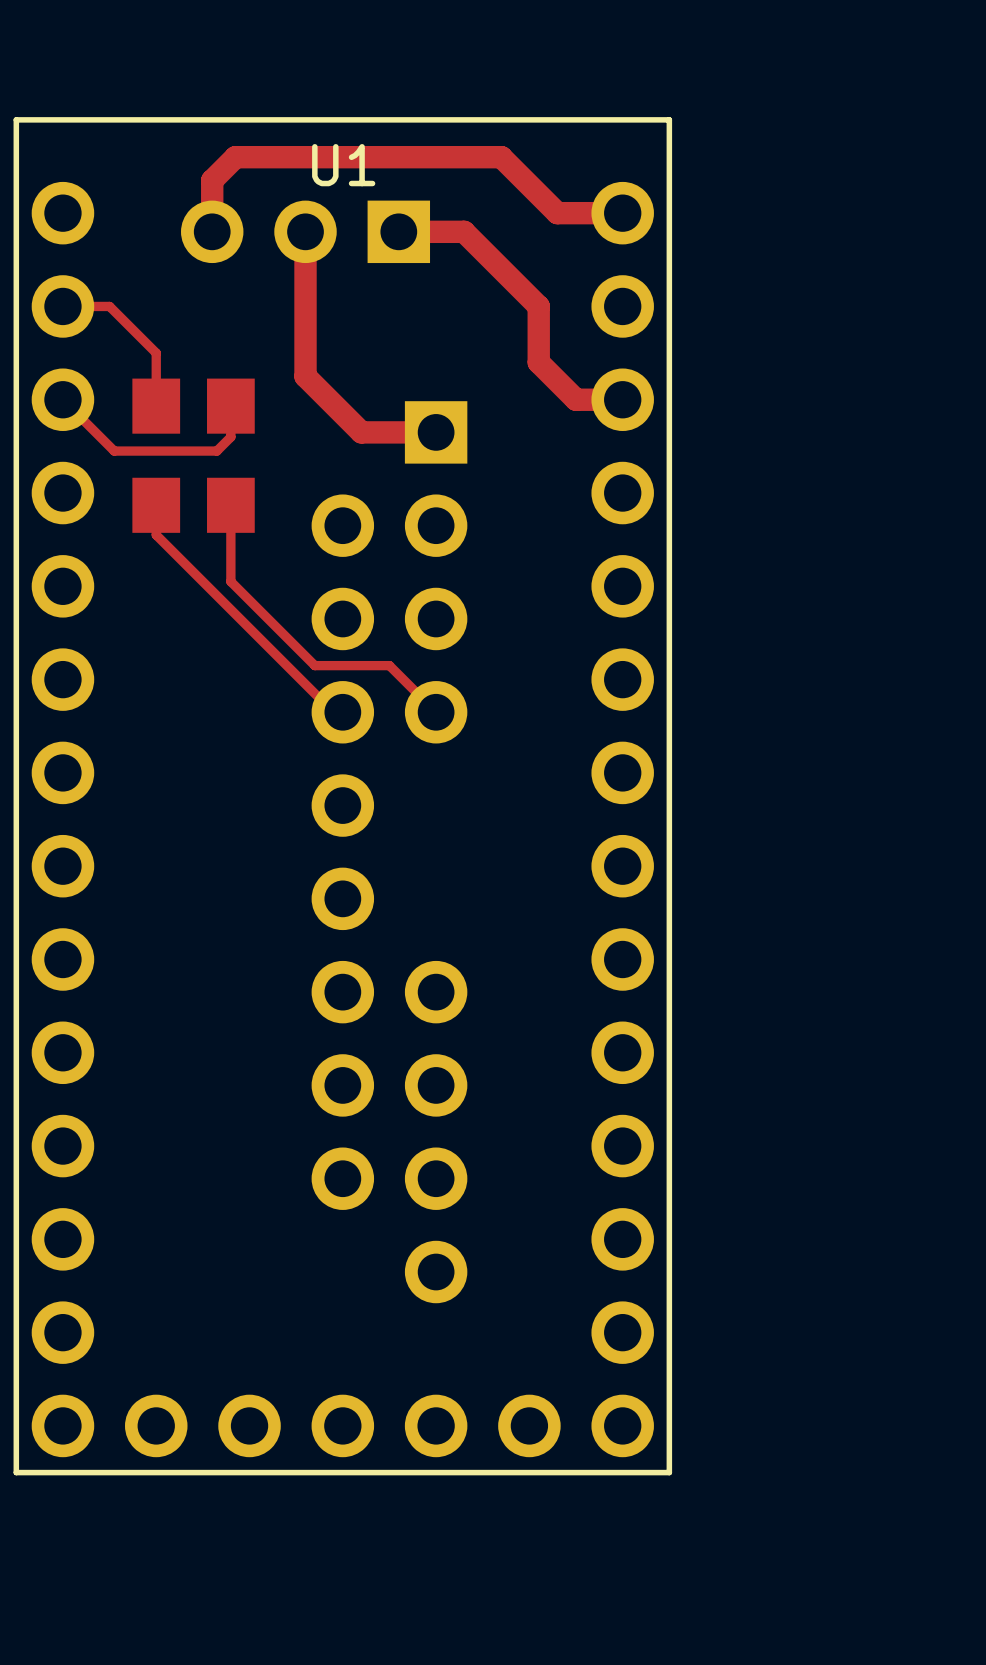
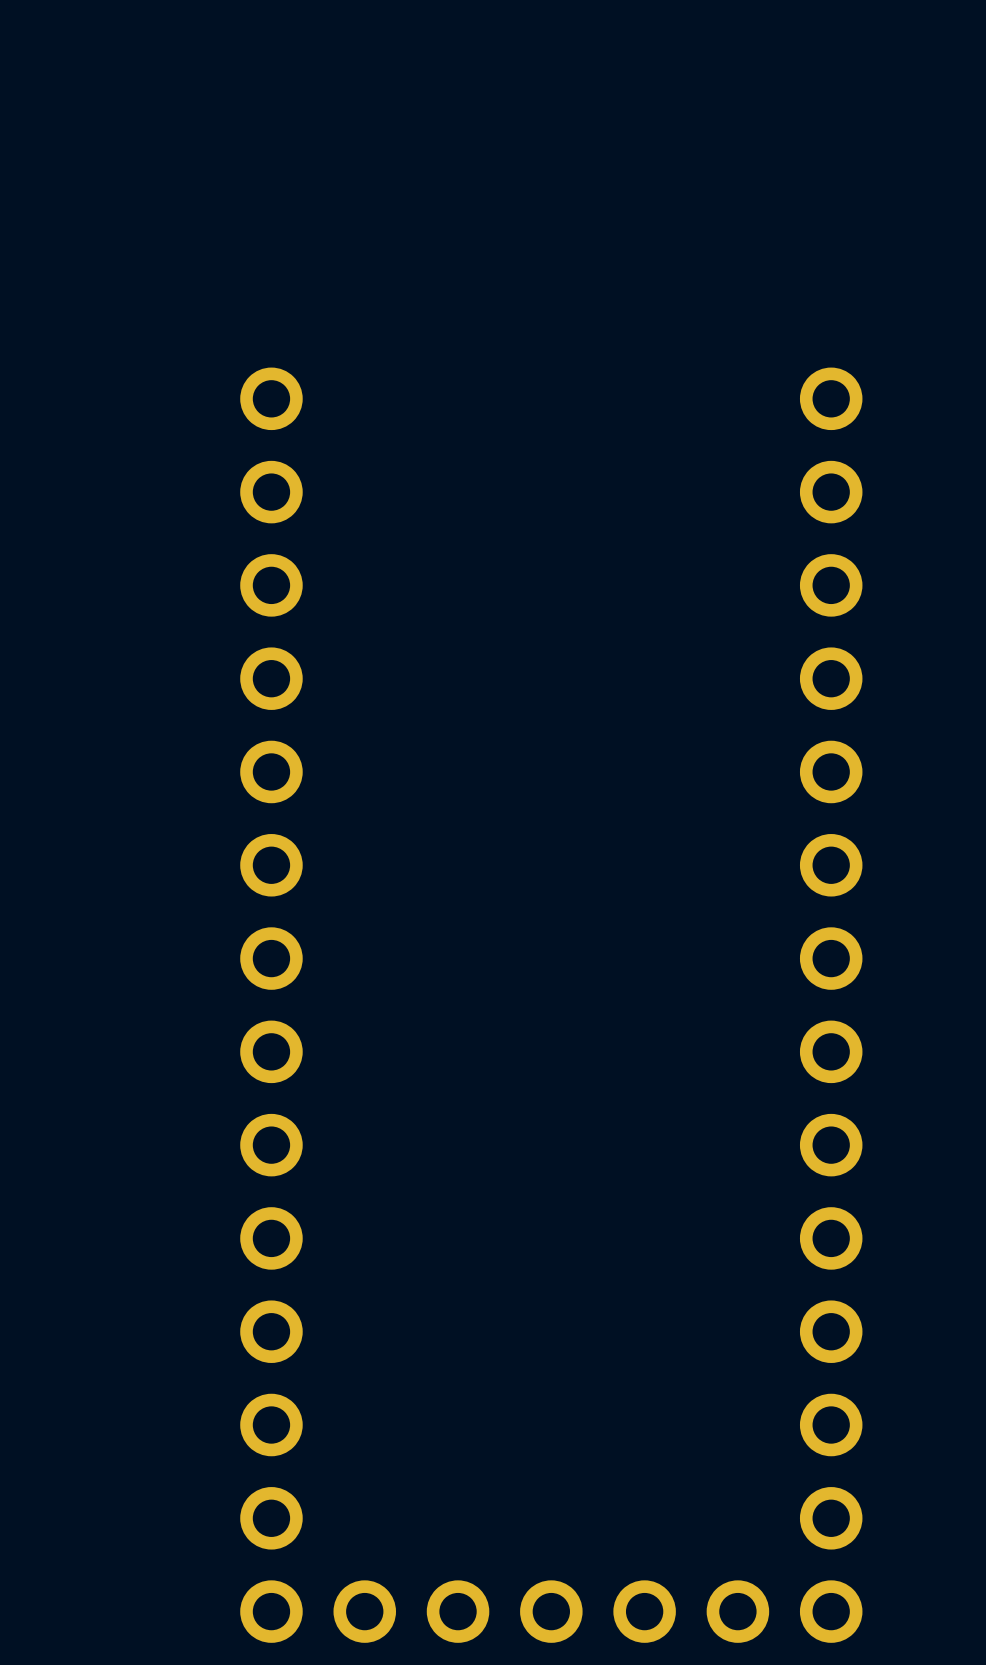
top track: (622, 213) (557, 213) (501, 157) (235, 157) (212, 180) (212, 231) -> none
top track: (305, 231) (305, 376) (361, 432) (436, 432) -> none
part: (305, 231) -> none
top track: (398, 231) (464, 231) (538, 306) (538, 362) (576, 399) (622, 399) -> none
top track: (62, 306) (109, 306) (156, 353) (156, 406) -> none
top track: (62, 399) (114, 451) (216, 451) (230, 437) (230, 406) -> none
part: (156, 455) -> none
part: (230, 455) -> none
top track: (156, 505) (156, 535) (333, 712) (342, 712) -> none
top track: (230, 505) (230, 581) (314, 665) (389, 665) (436, 712) -> none
U1 side: bottom (342, 796) -> top (551, 1005)
part: (389, 852) -> none

